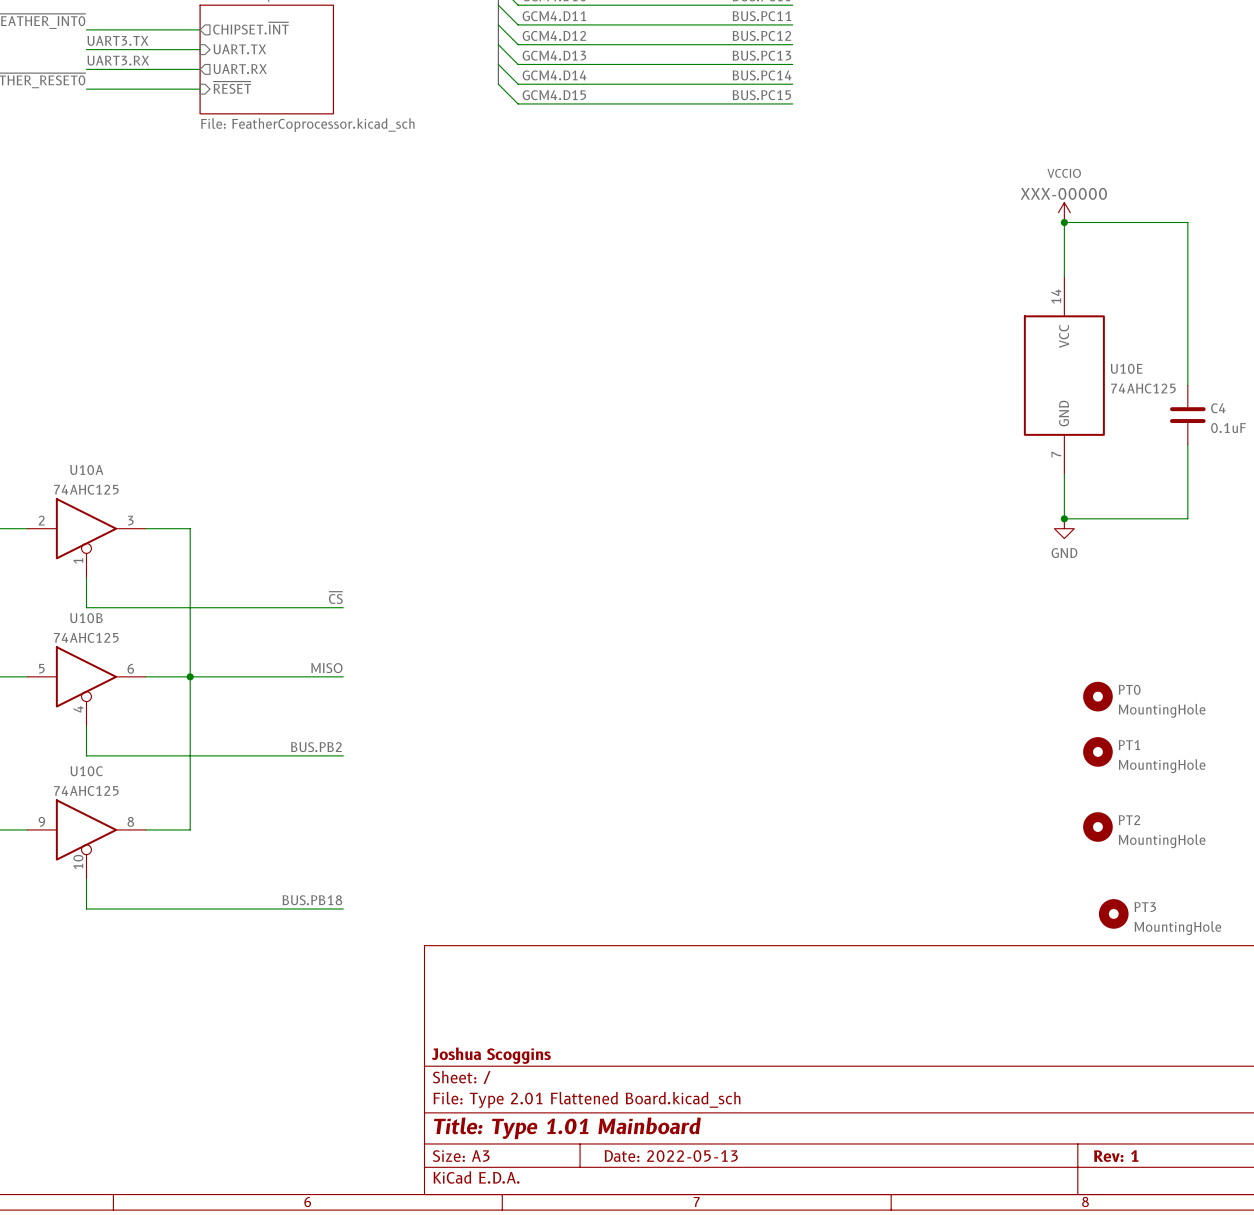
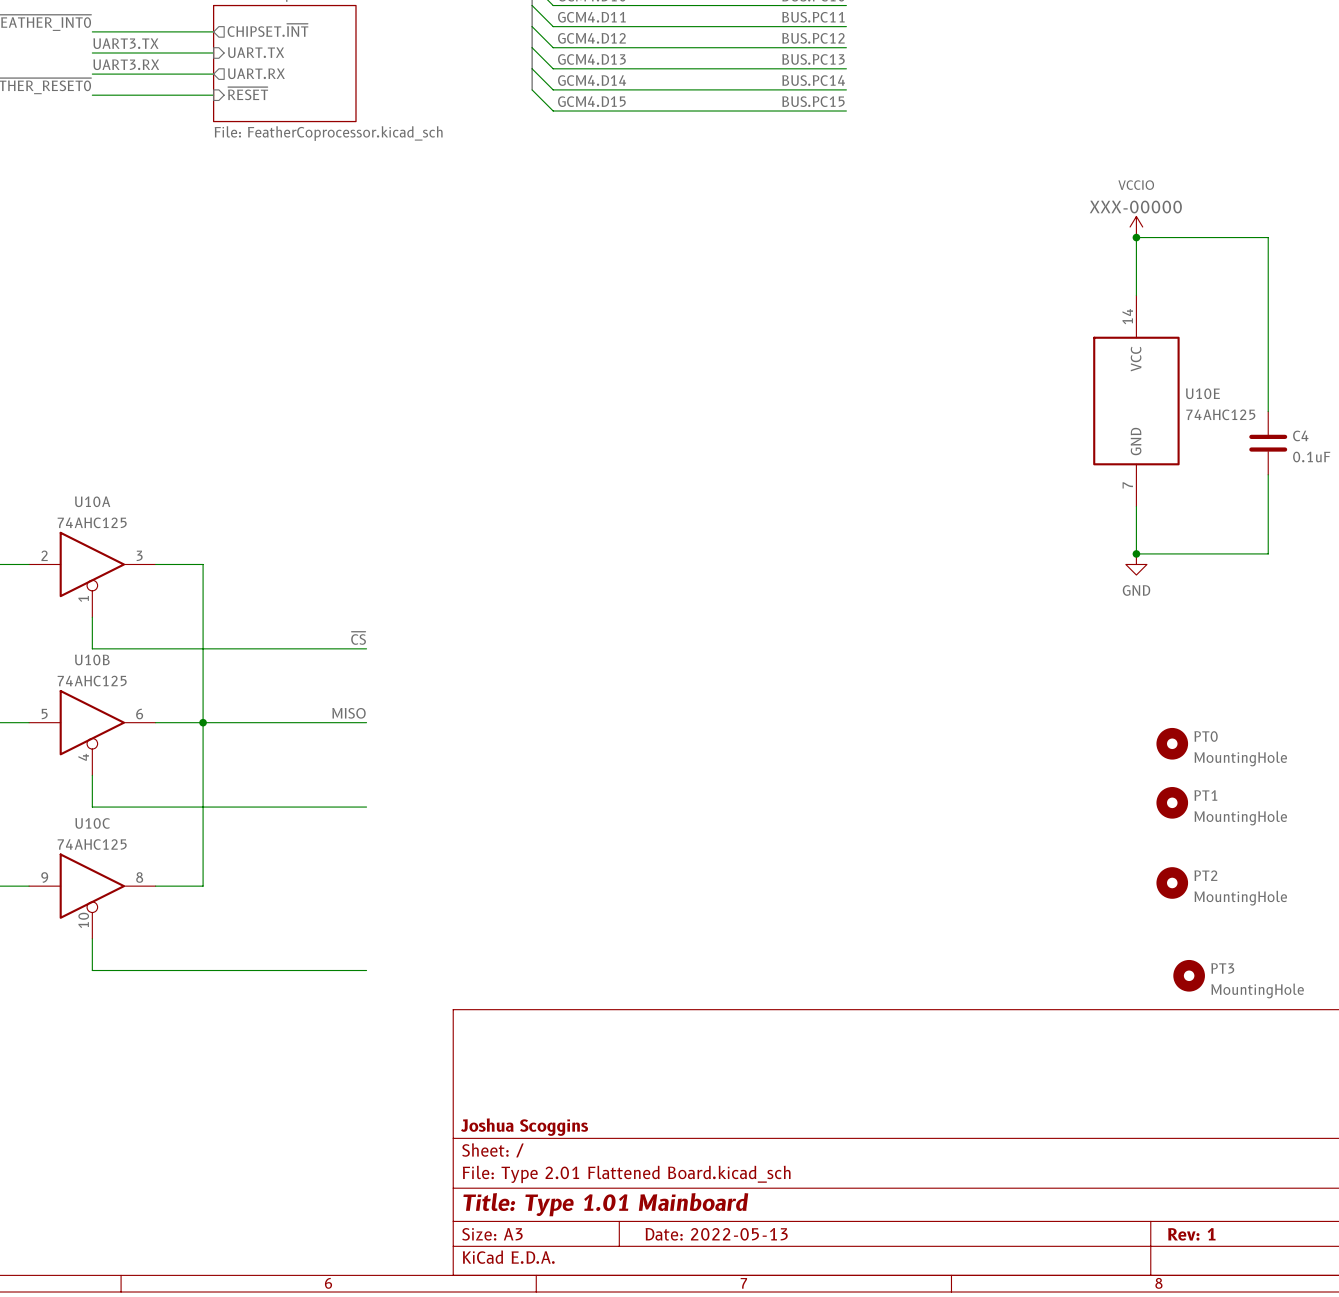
label: BUS.PB2 (316, 747) -> none
label: BUS.PB18 (312, 900) -> none

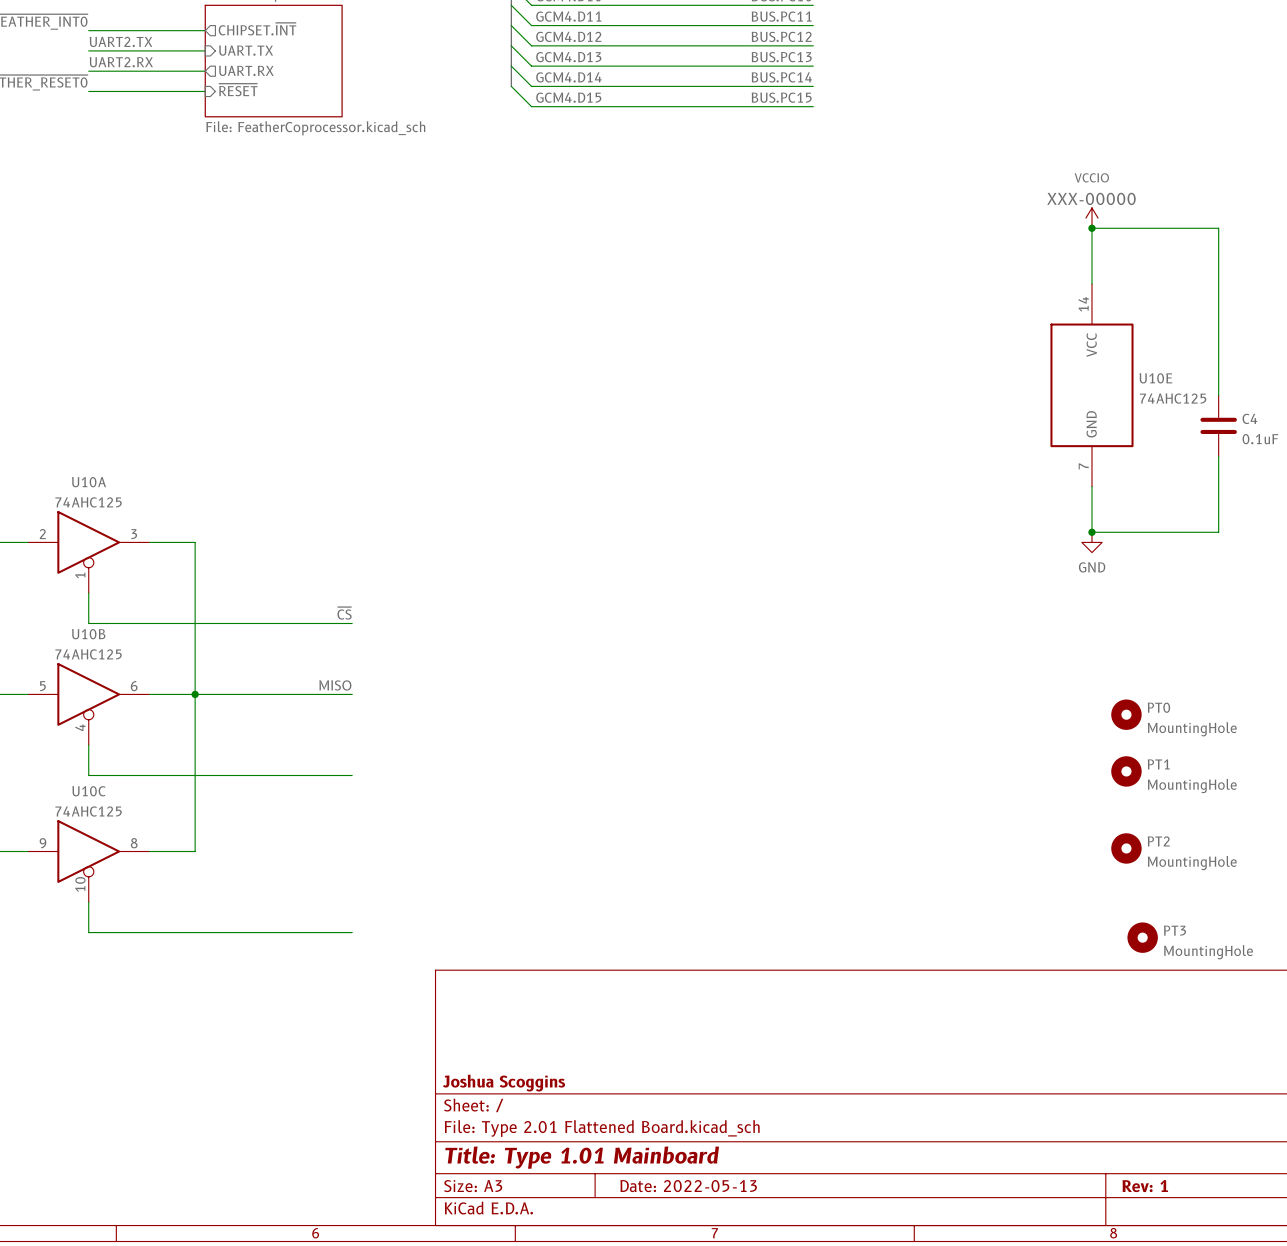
label: UART3.TX (125, 43) -> UART2.TX (121, 41)
label: UART3.RX (126, 64) -> UART2.RX (121, 62)

